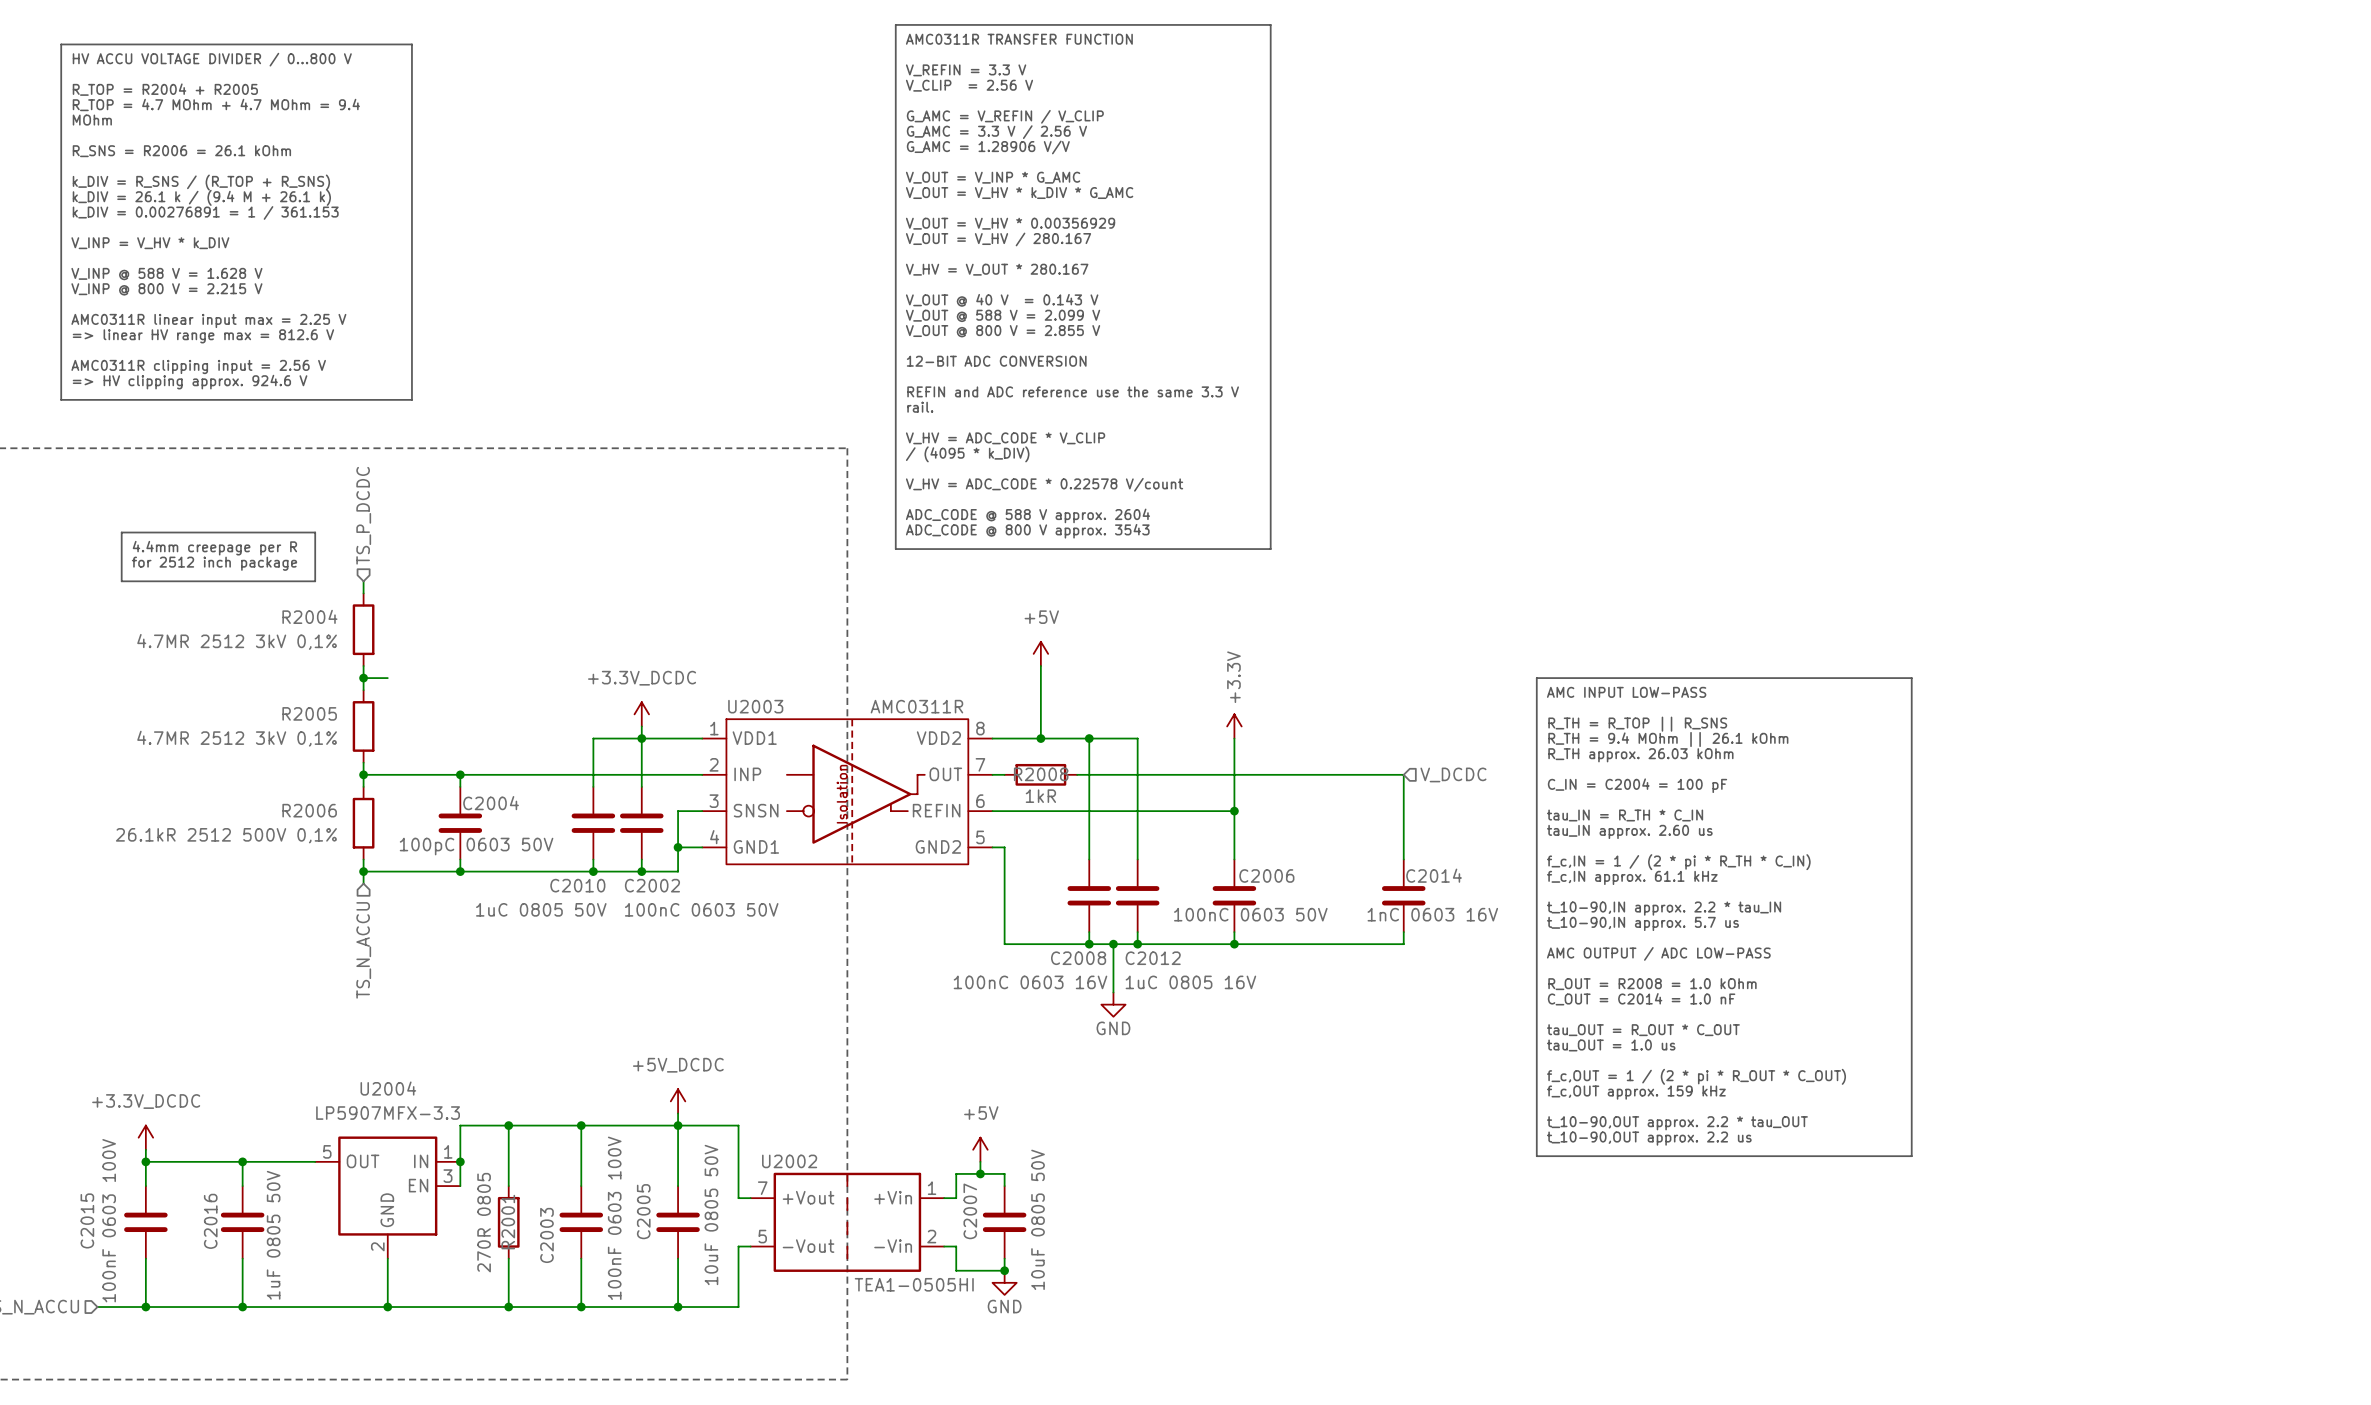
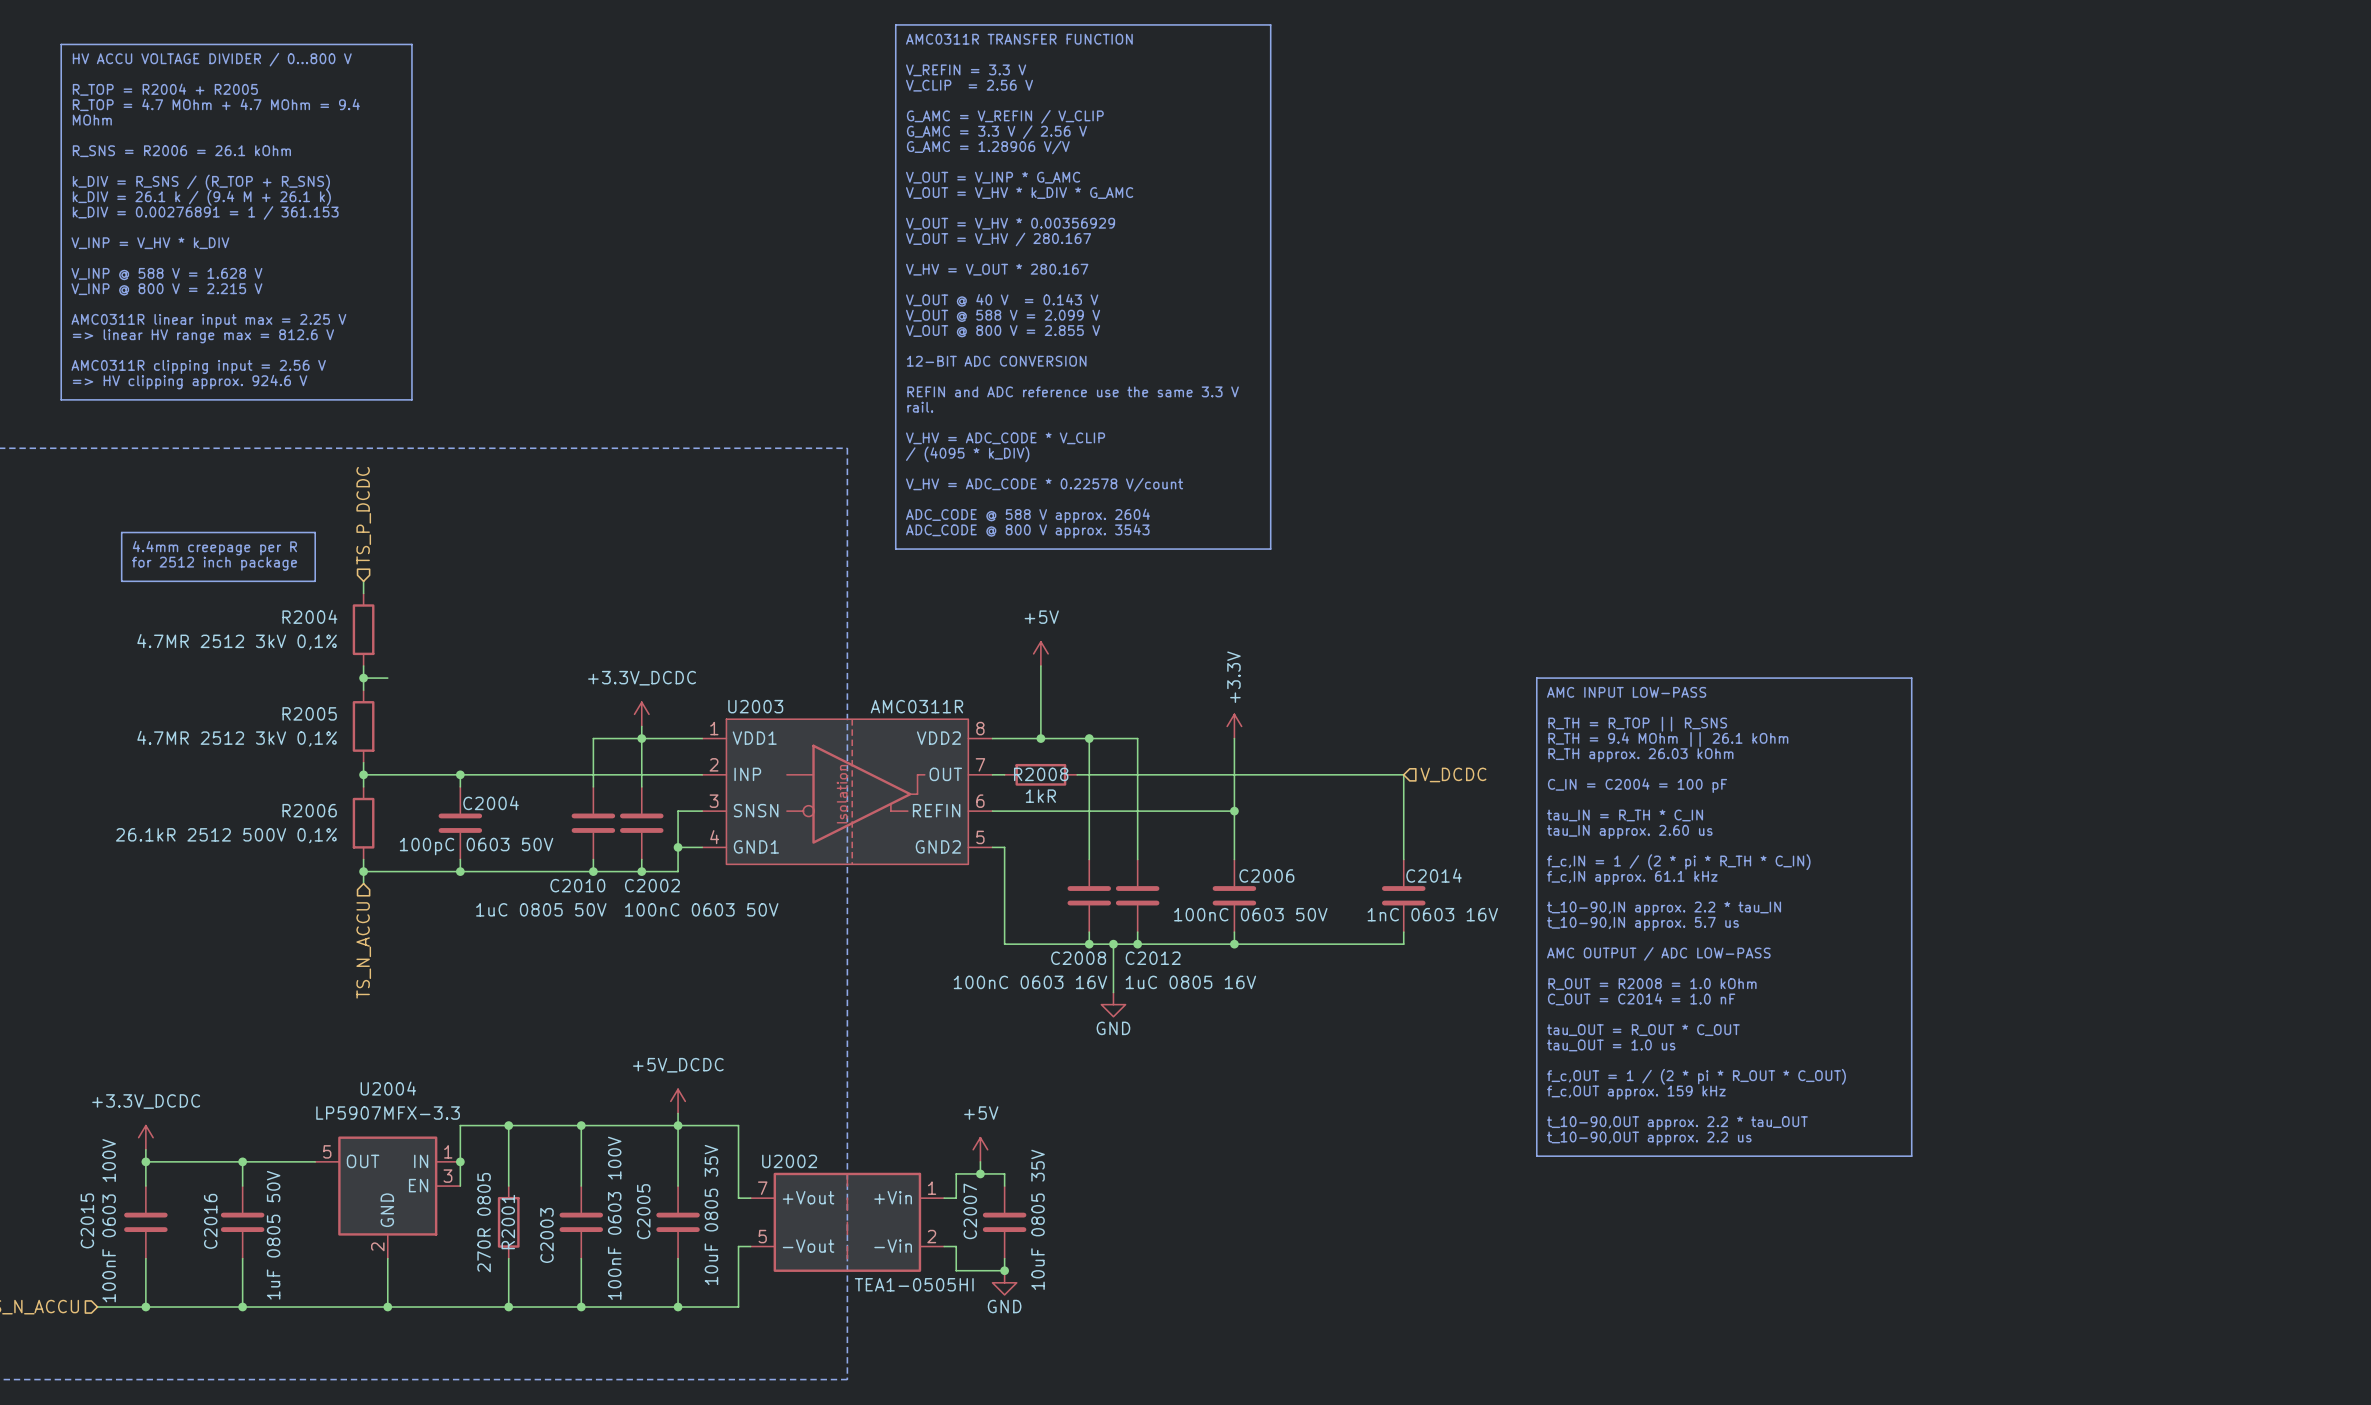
C2005 value: 10uF 0805 50V (711, 1214) -> 10uF 0805 35V (711, 1214)
C2007 value: 10uF 0805 50V (1038, 1219) -> 10uF 0805 35V (1038, 1219)

